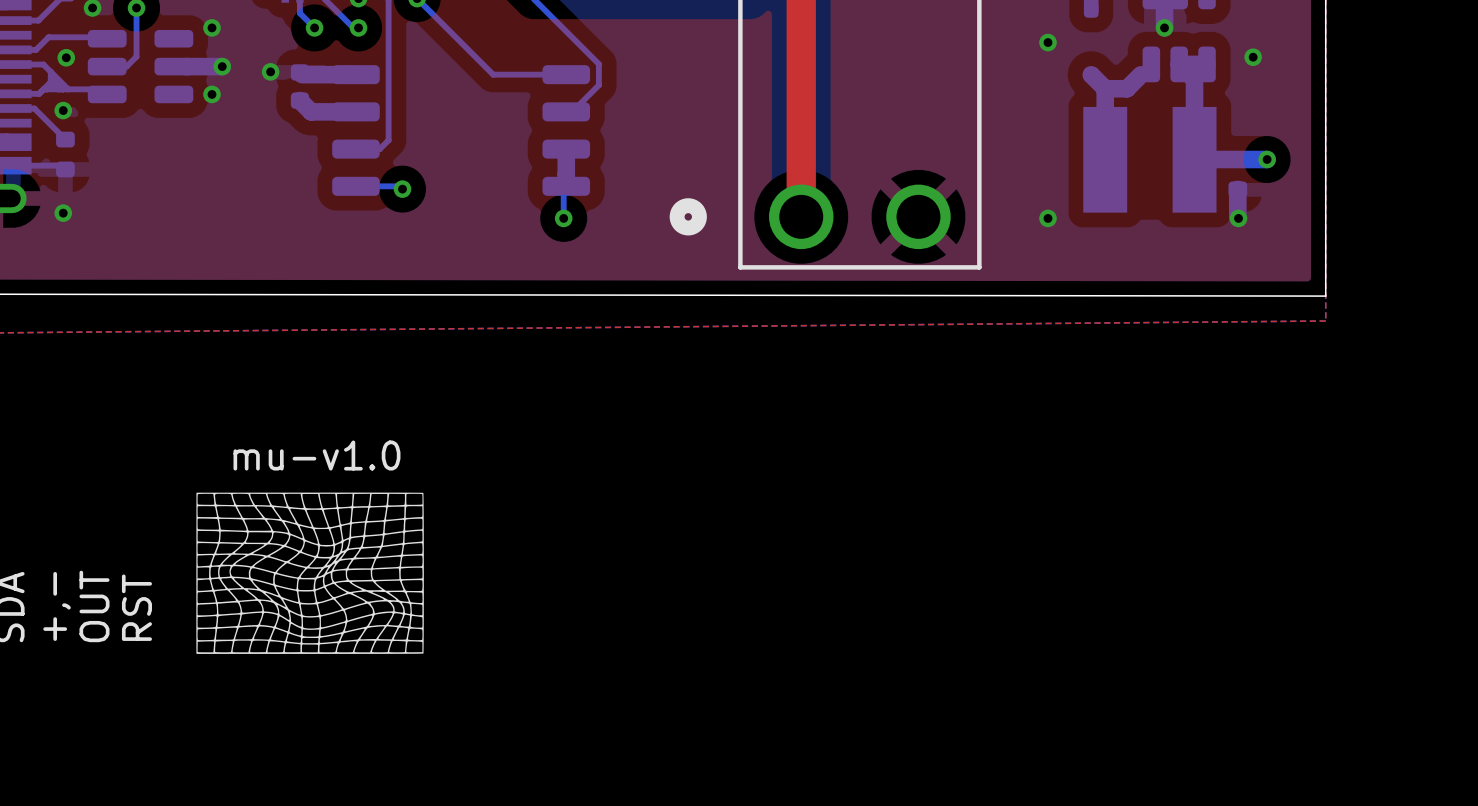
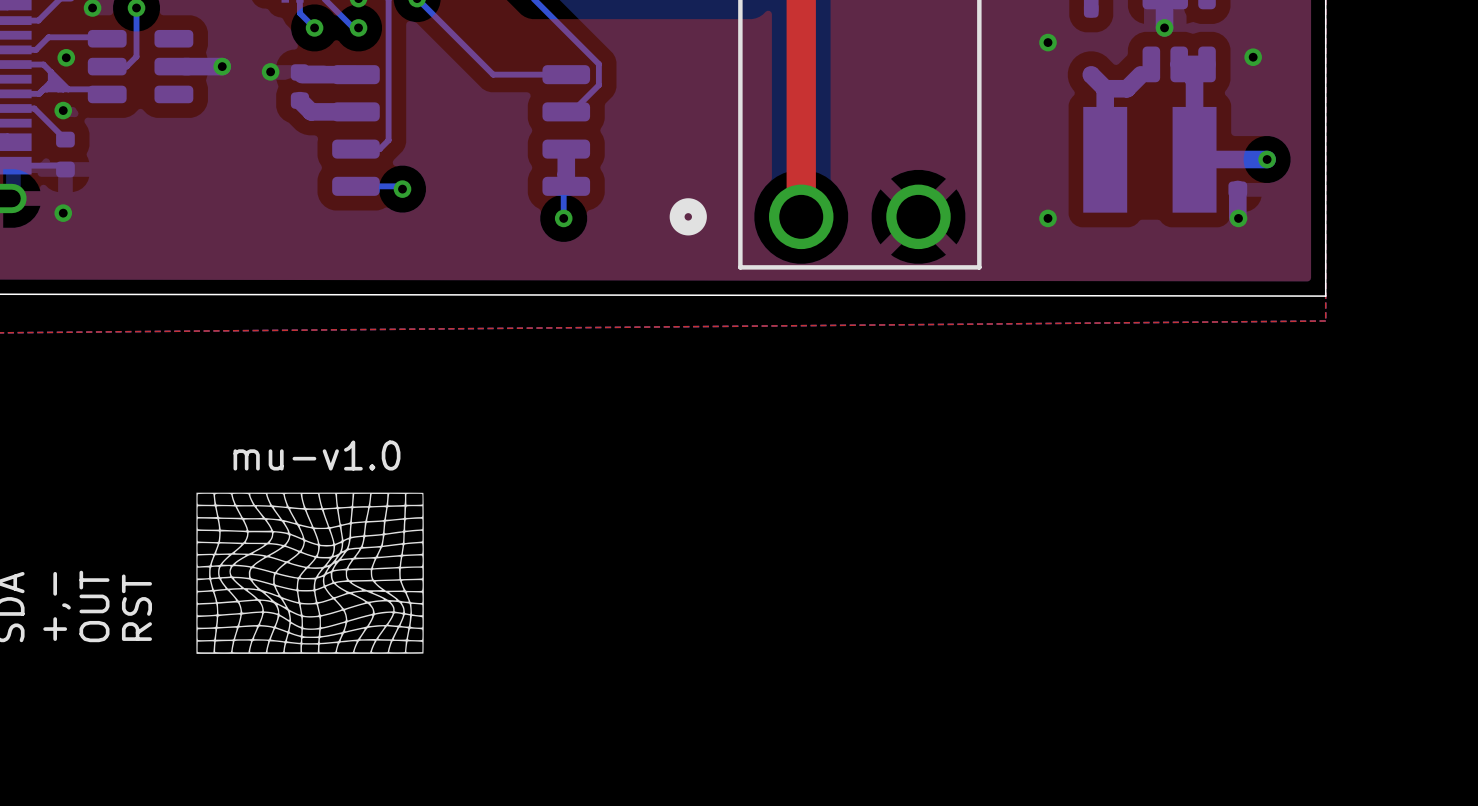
via: (211, 27) -> none
via: (211, 94) -> none

